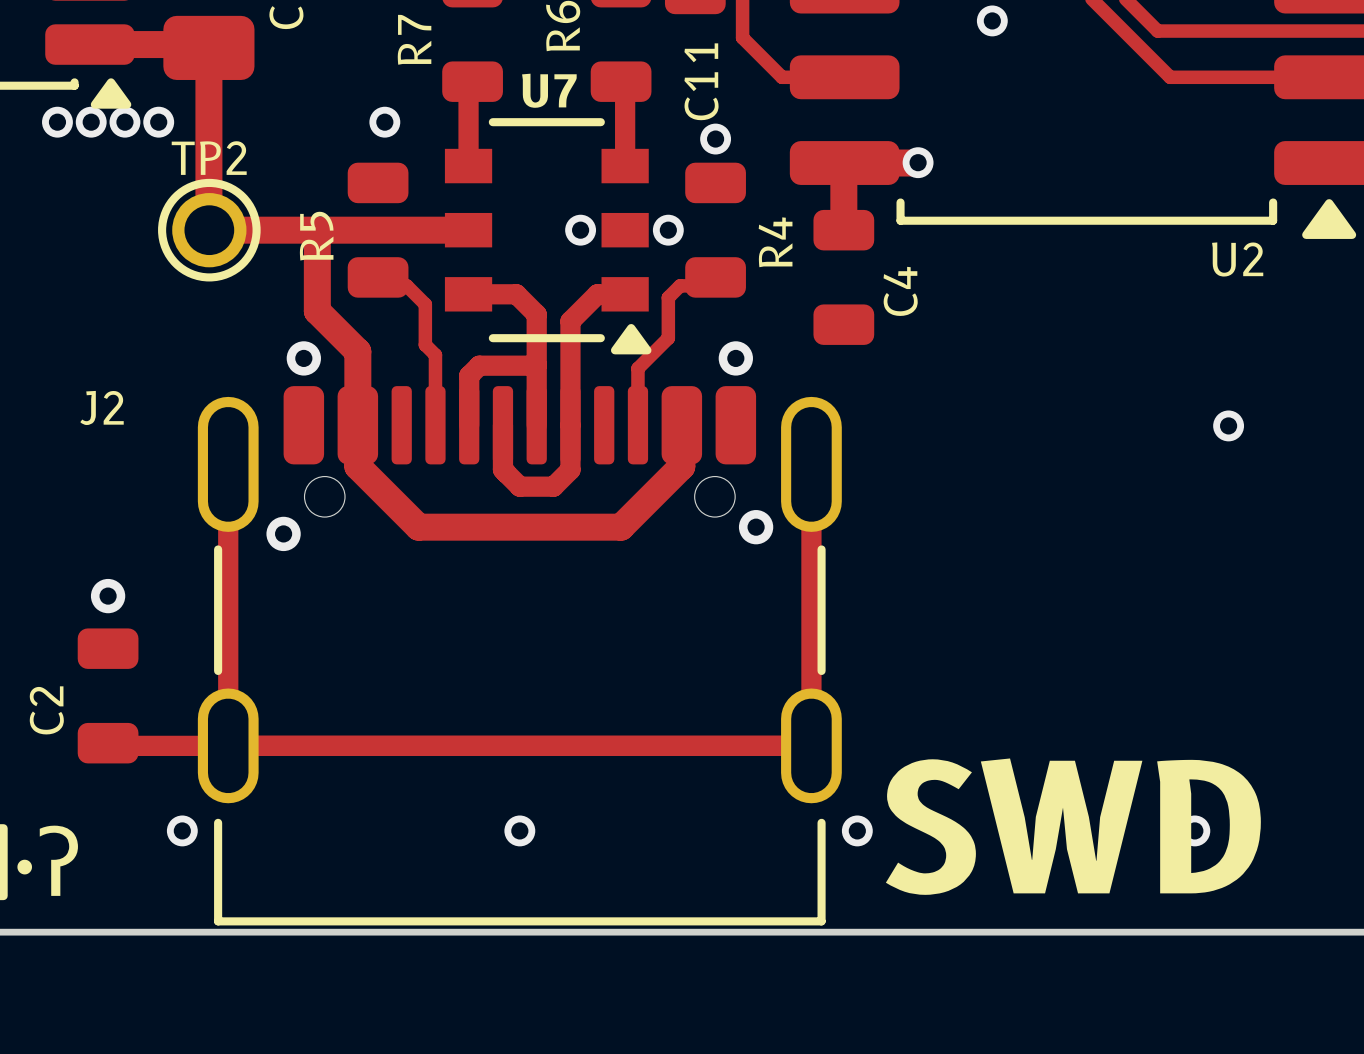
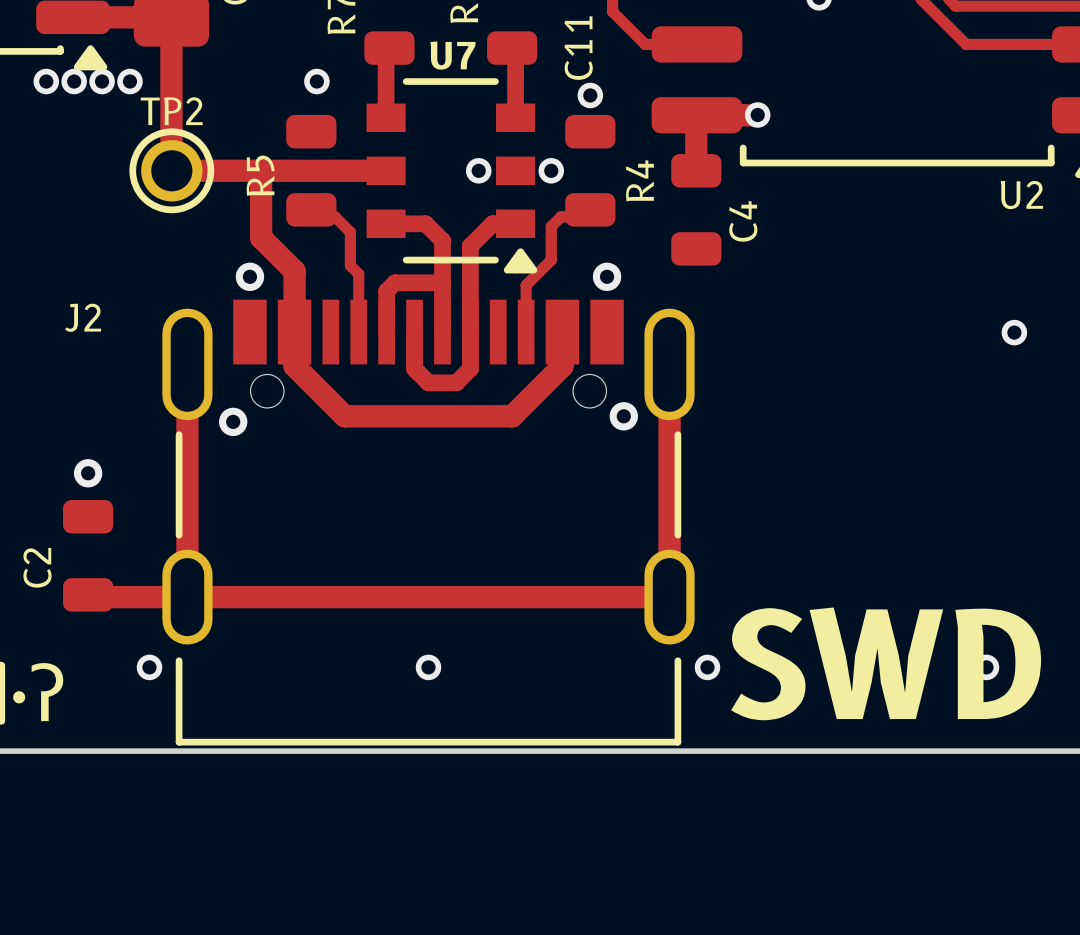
J2 footprint: [197, 386, 842, 926] -> [162, 299, 695, 746]
track width: thin (228, 464) (228, 745) -> thick (187, 364) (187, 597)
track width: thin (811, 464) (811, 745) (110, 745) -> thick (669, 364) (669, 597) (90, 597)

